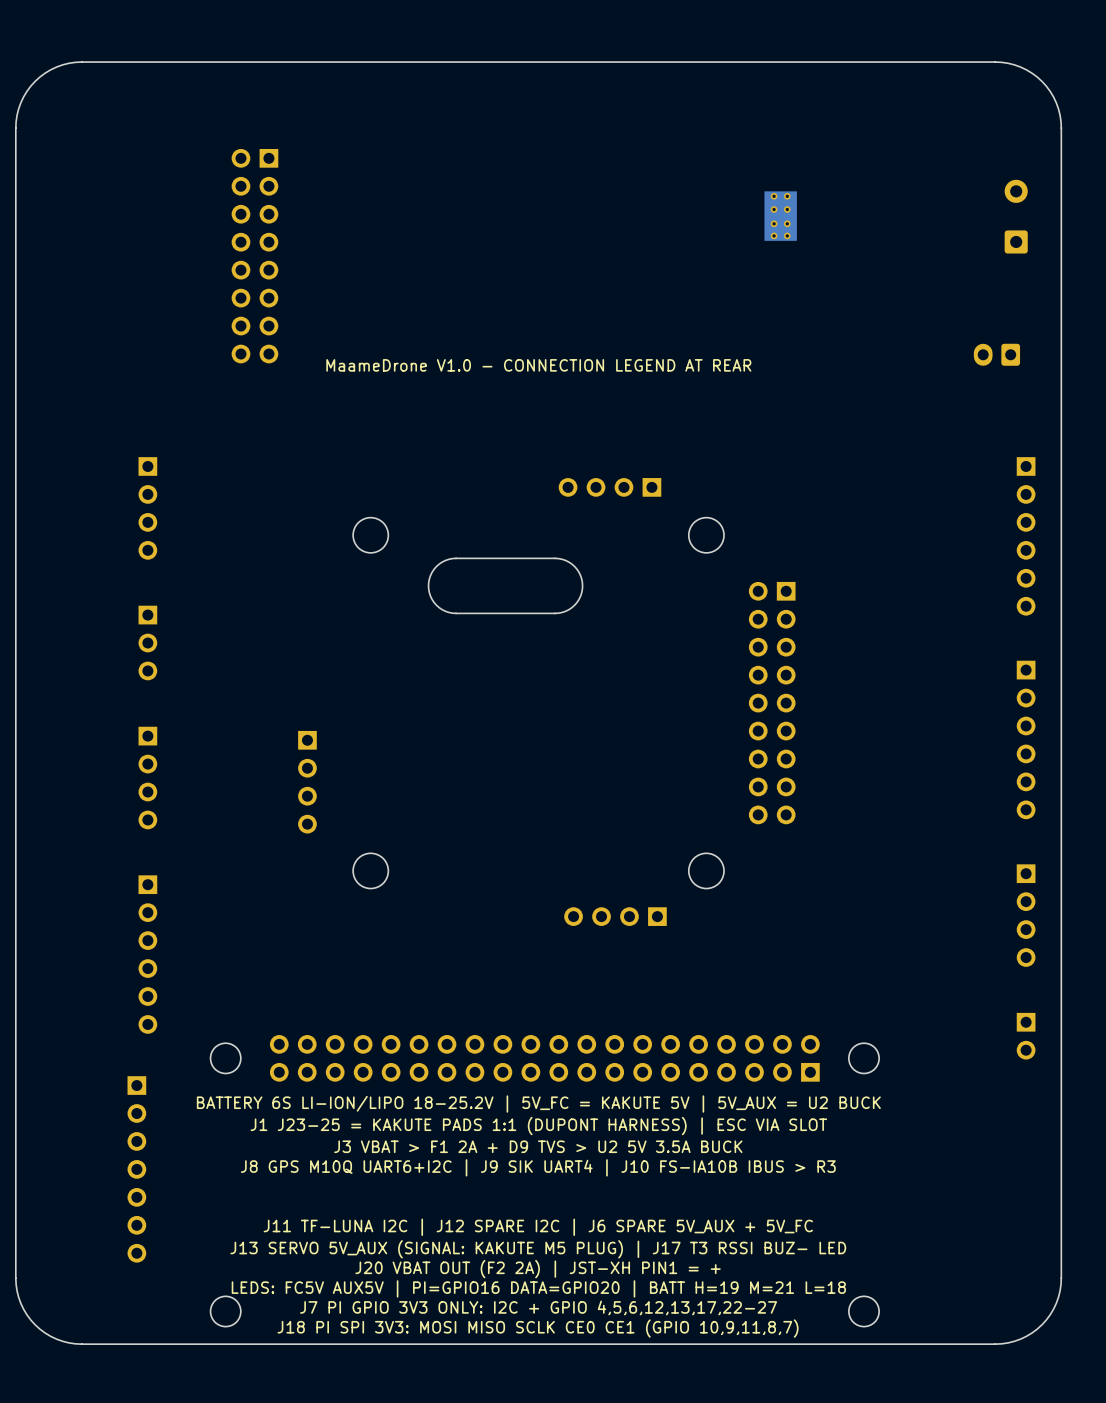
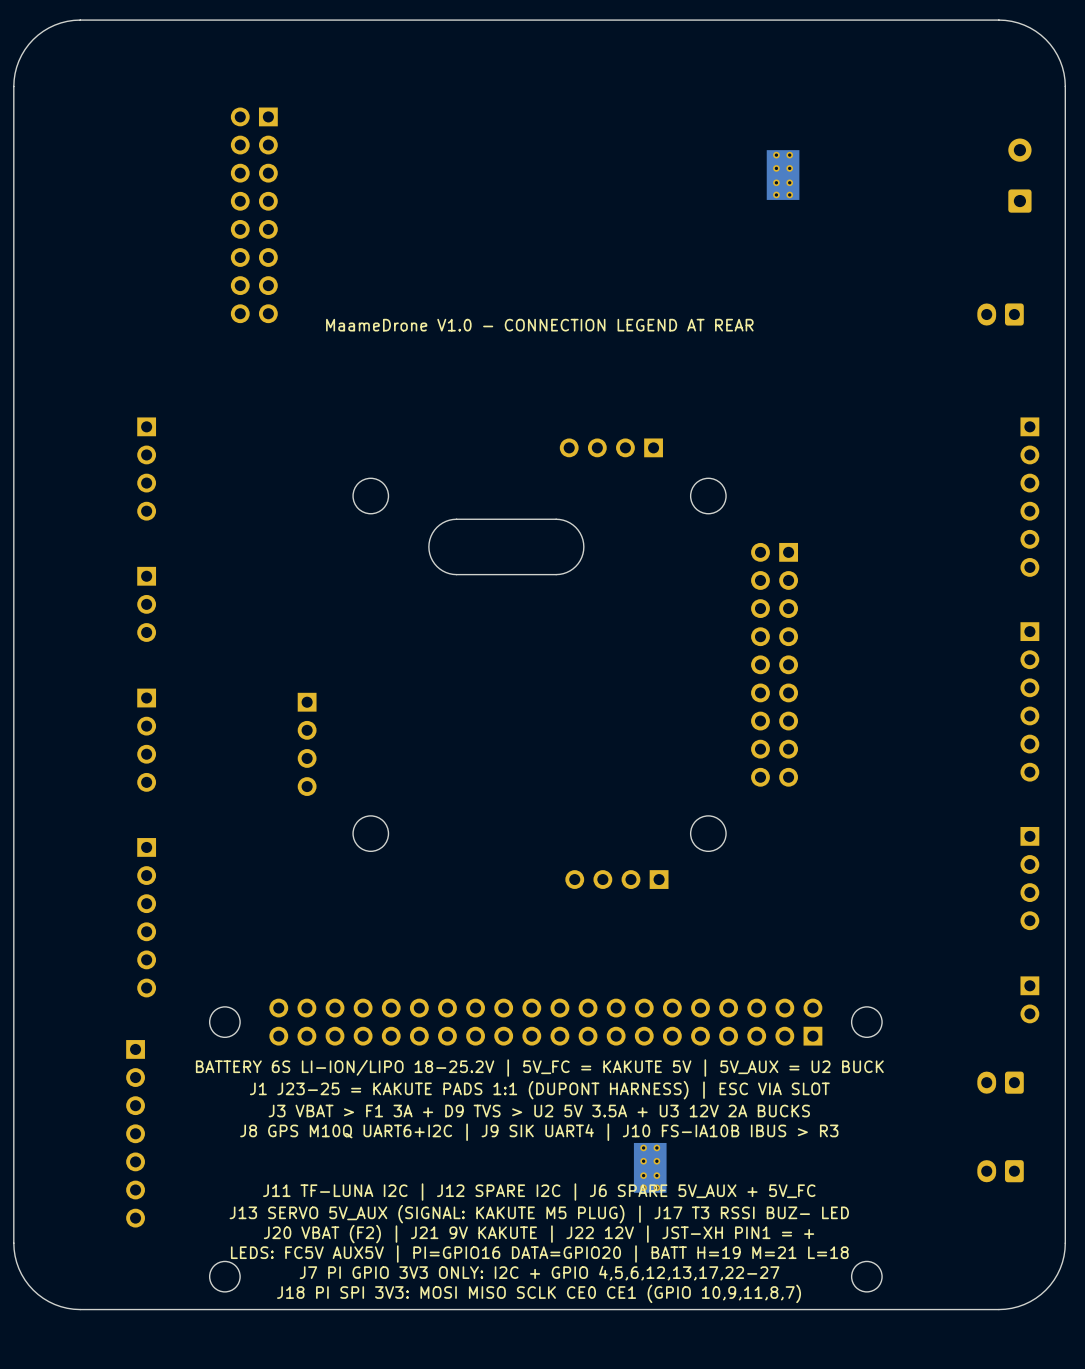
part: none -> (1000, 1082)
text: J3 VBAT > F1 2A + D9 TVS > U2 5V 3.5A BUCK (538, 1146) -> J3 VBAT > F1 3A + D9 TVS > U2 5V 3.5A + U3 12V 2A BUCKS (539, 1111)
part: none -> (650, 1167)
part: none -> (1000, 1171)
text: J20 VBAT OUT (F2 2A) | JST-XH PIN1 = + (538, 1269) -> J20 VBAT (F2) | J21 9V KAKUTE | J22 12V | JST-XH PIN1 = + (539, 1234)

